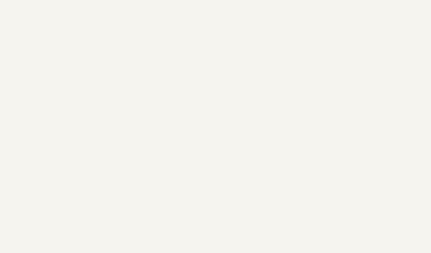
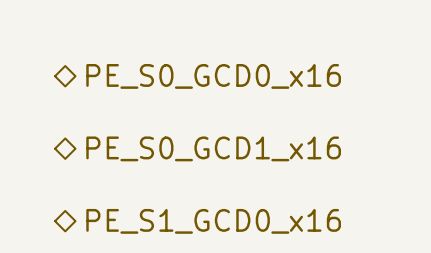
hierarchical label: none -> PE_S0_GCD0_x16 (213, 76)
hierarchical label: none -> PE_S0_GCD1_x16 (213, 148)
hierarchical label: none -> PE_S1_GCD0_x16 (213, 221)

